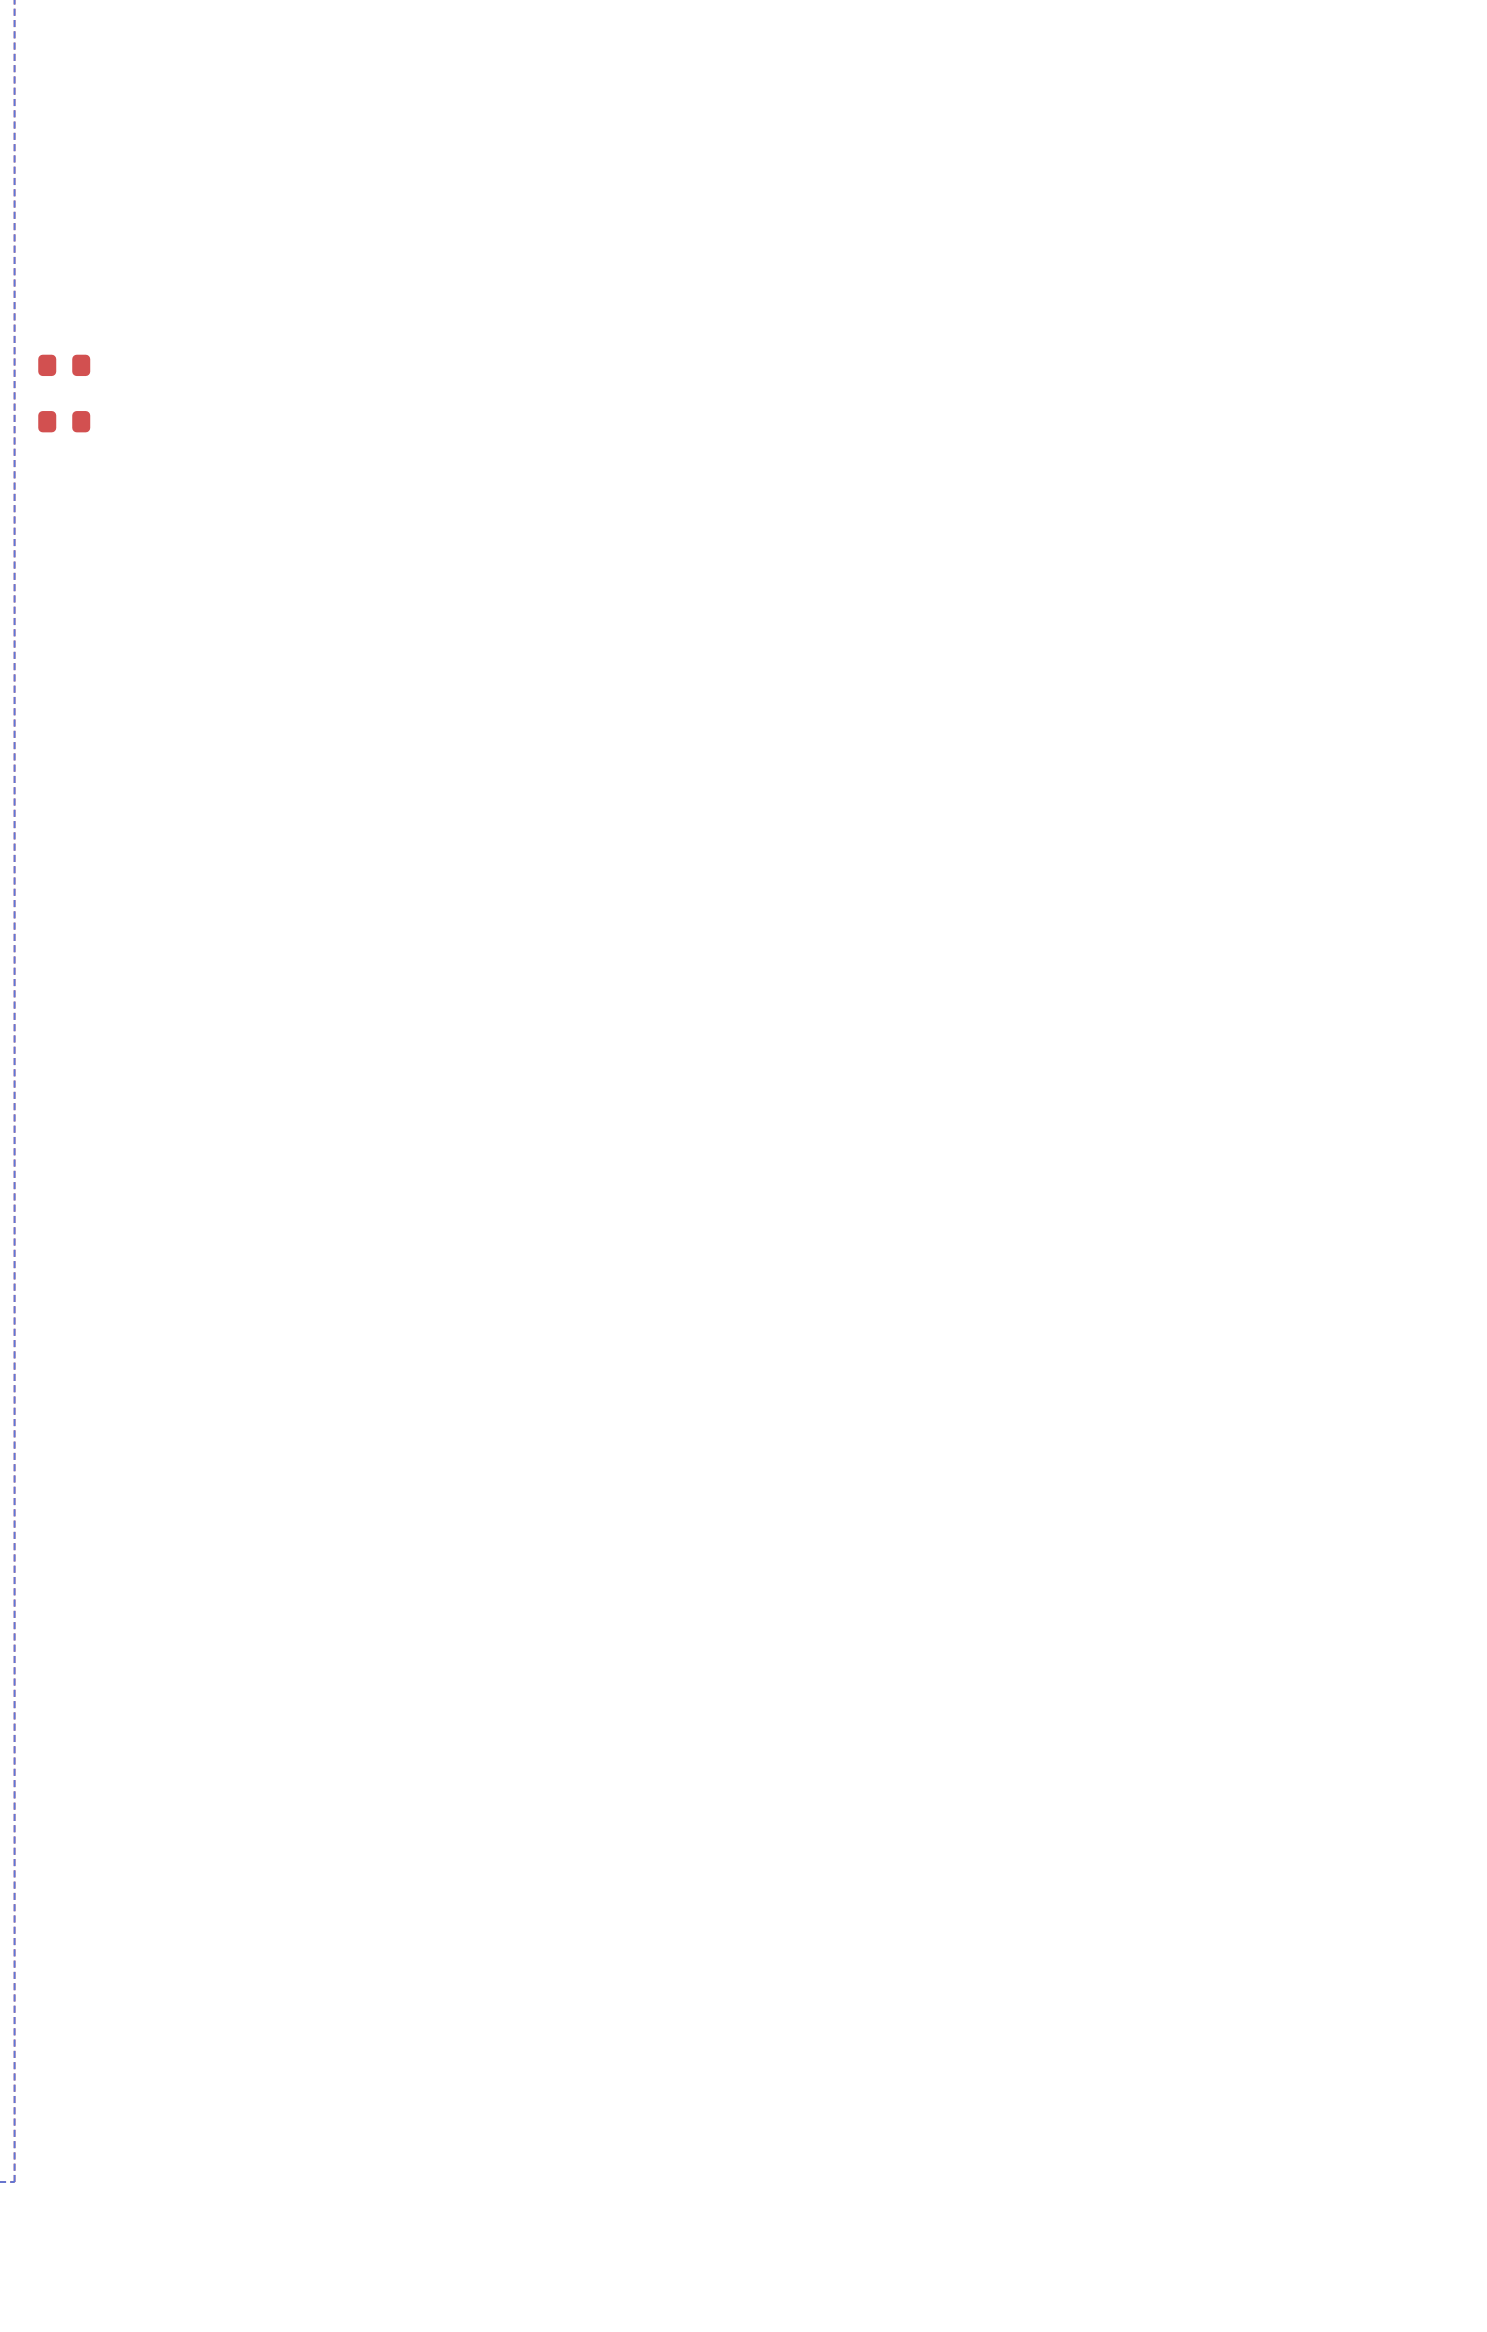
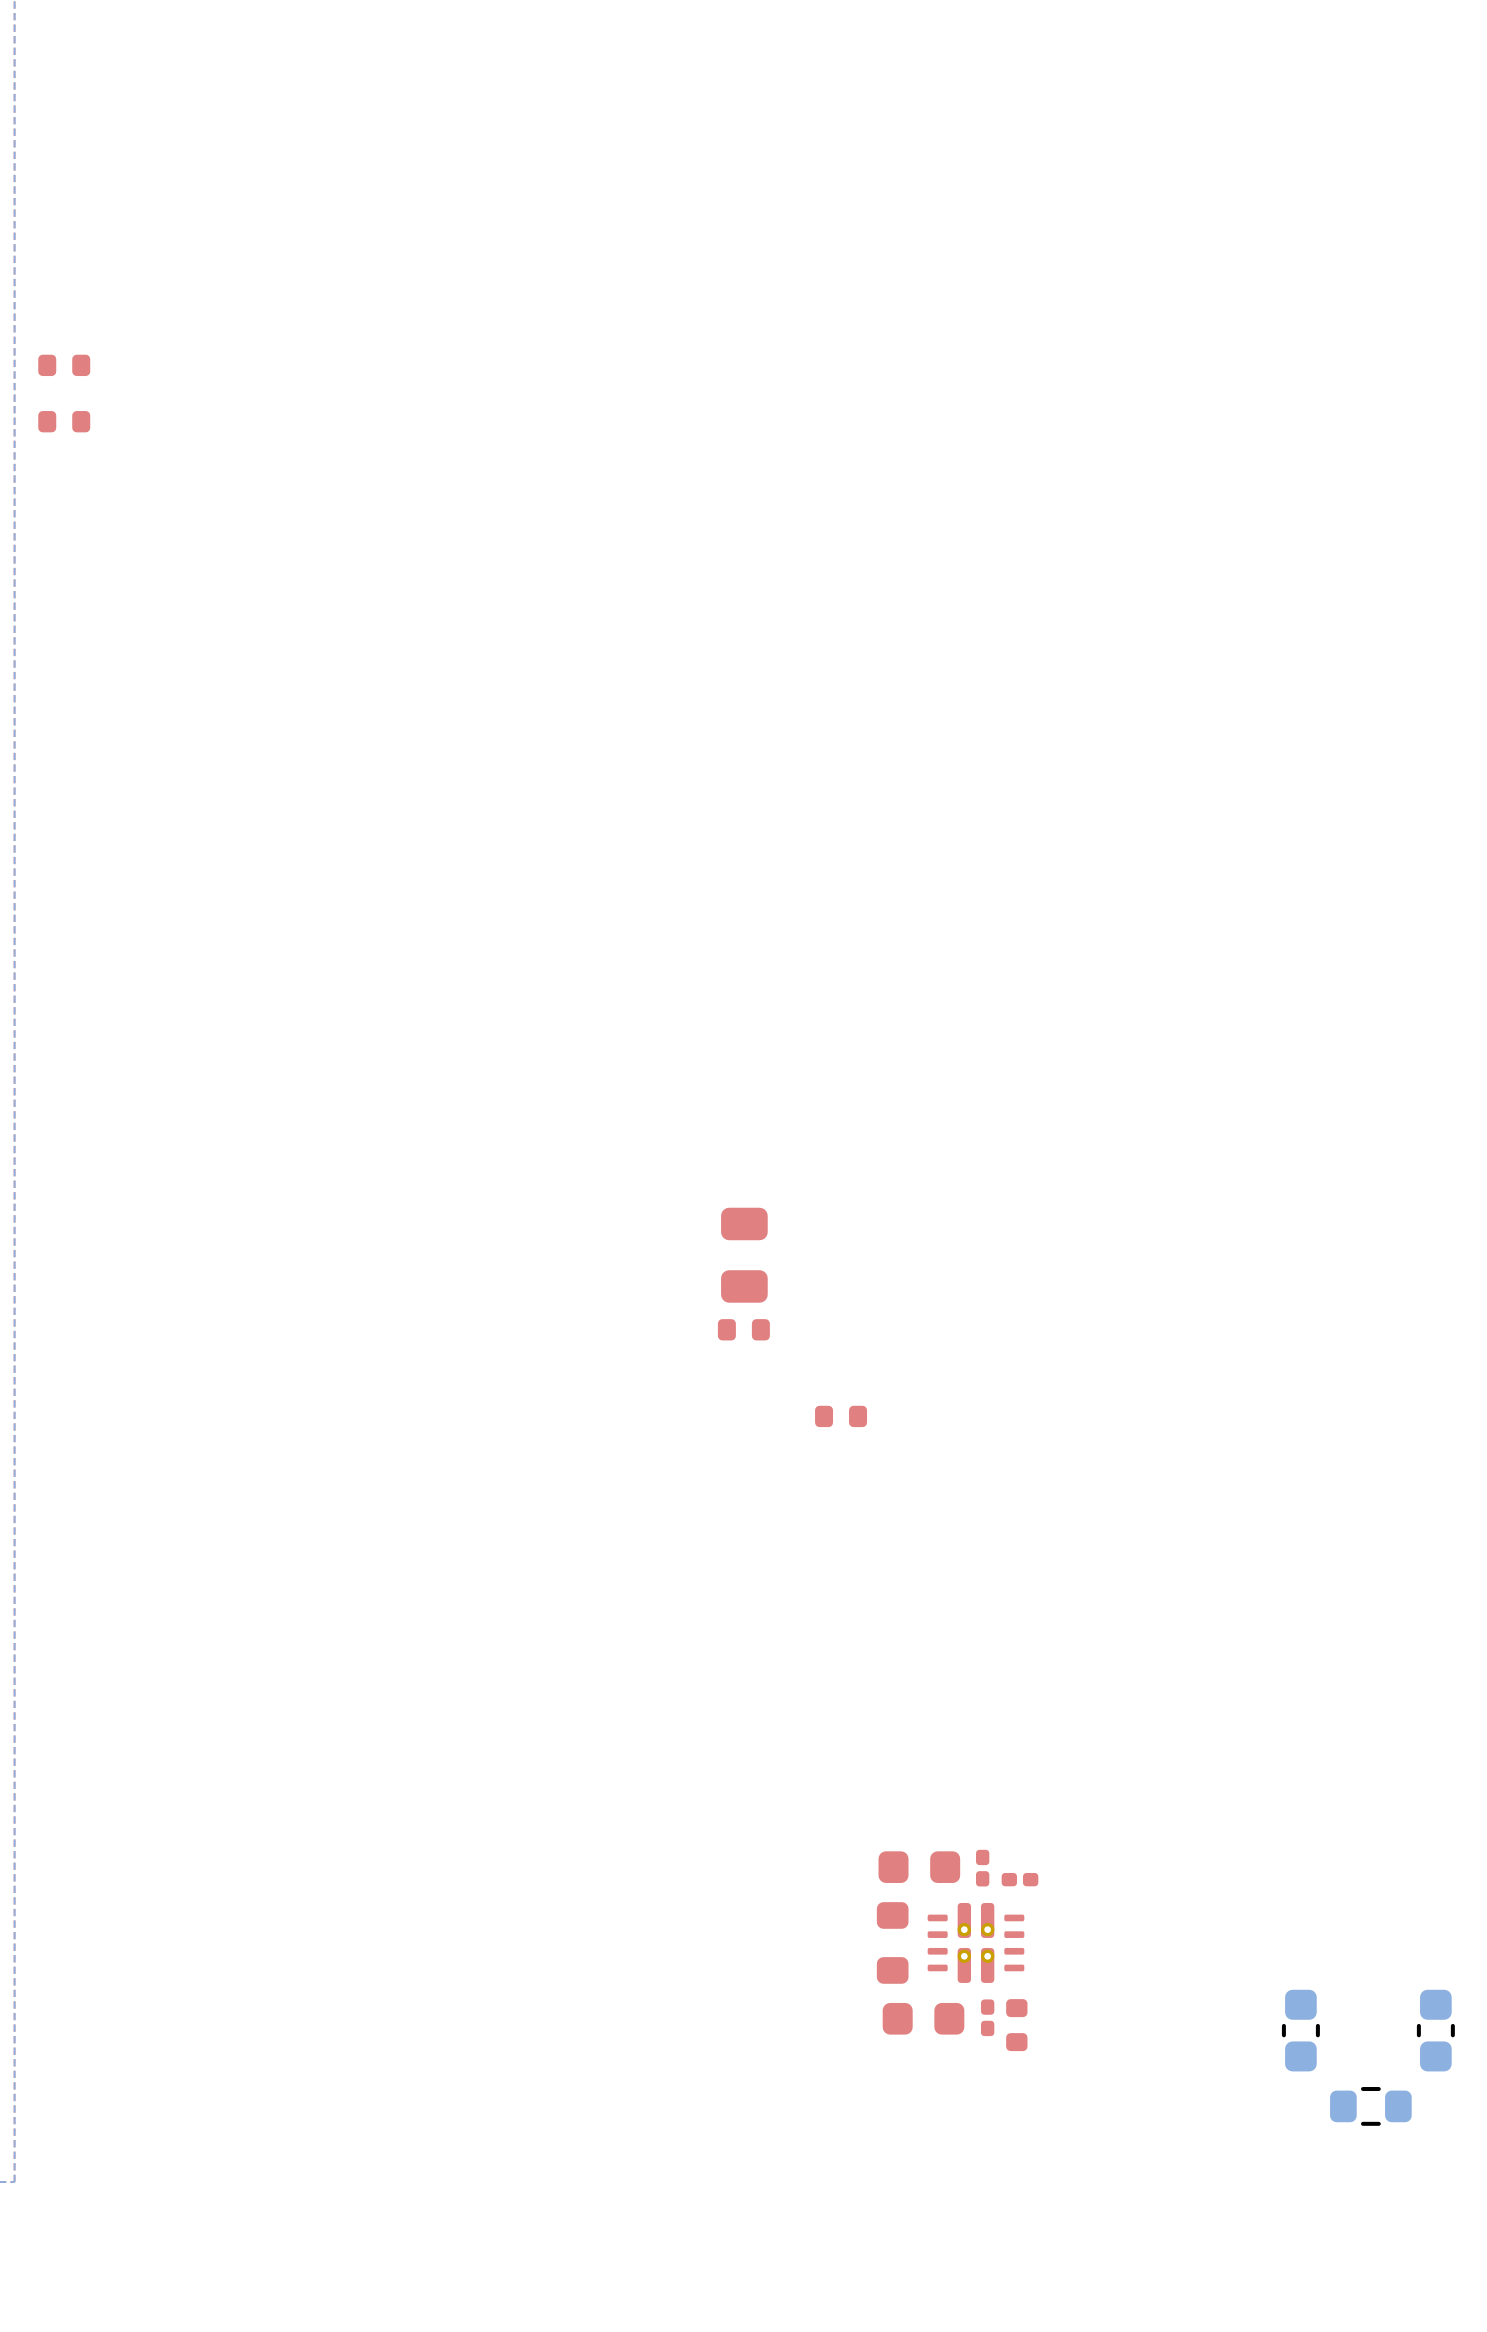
part: none -> (744, 1255)
part: none -> (743, 1329)
part: none -> (841, 1416)
part: none -> (919, 1867)
part: none -> (982, 1868)
part: none -> (1019, 1879)
part: none -> (892, 1942)
part: none -> (975, 1942)
part: none -> (987, 2017)
part: none -> (923, 2018)
part: none -> (1016, 2025)
part: none -> (1300, 2030)
part: none -> (1435, 2030)
part: none -> (1370, 2106)

